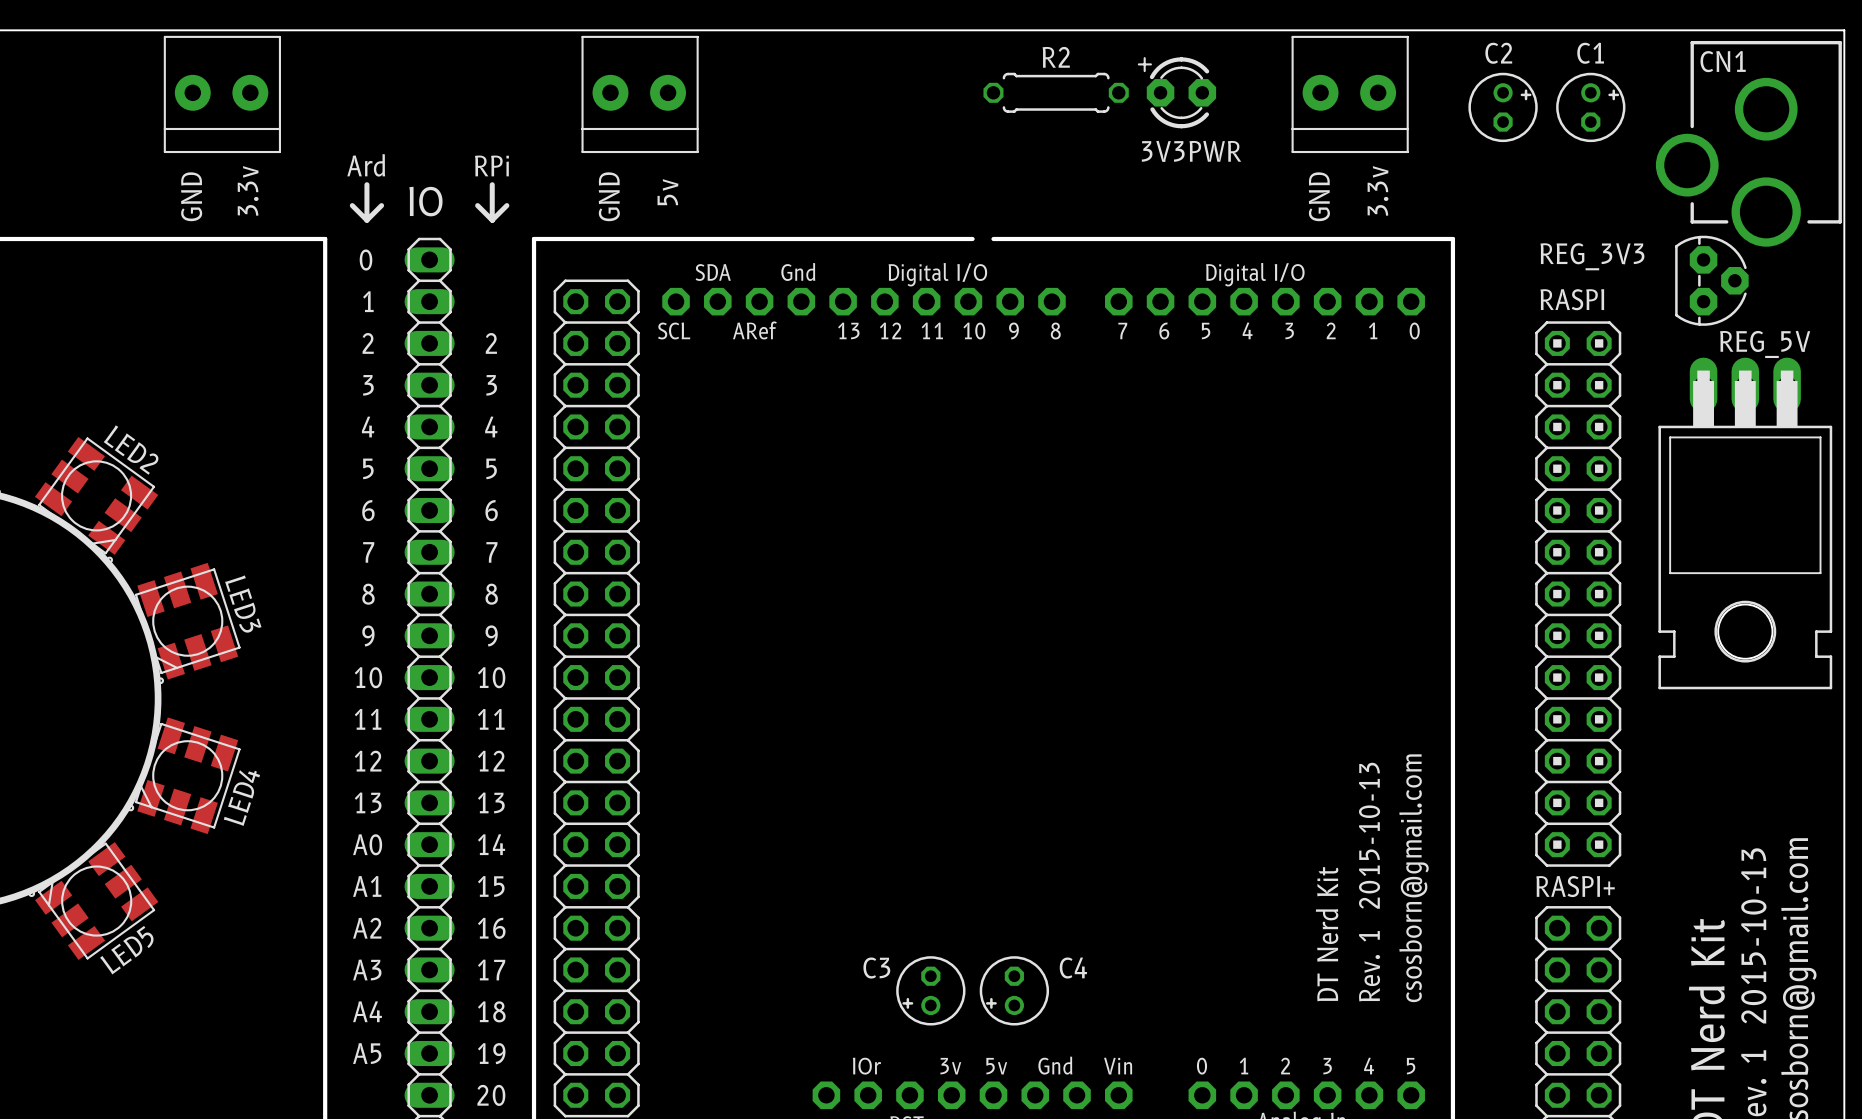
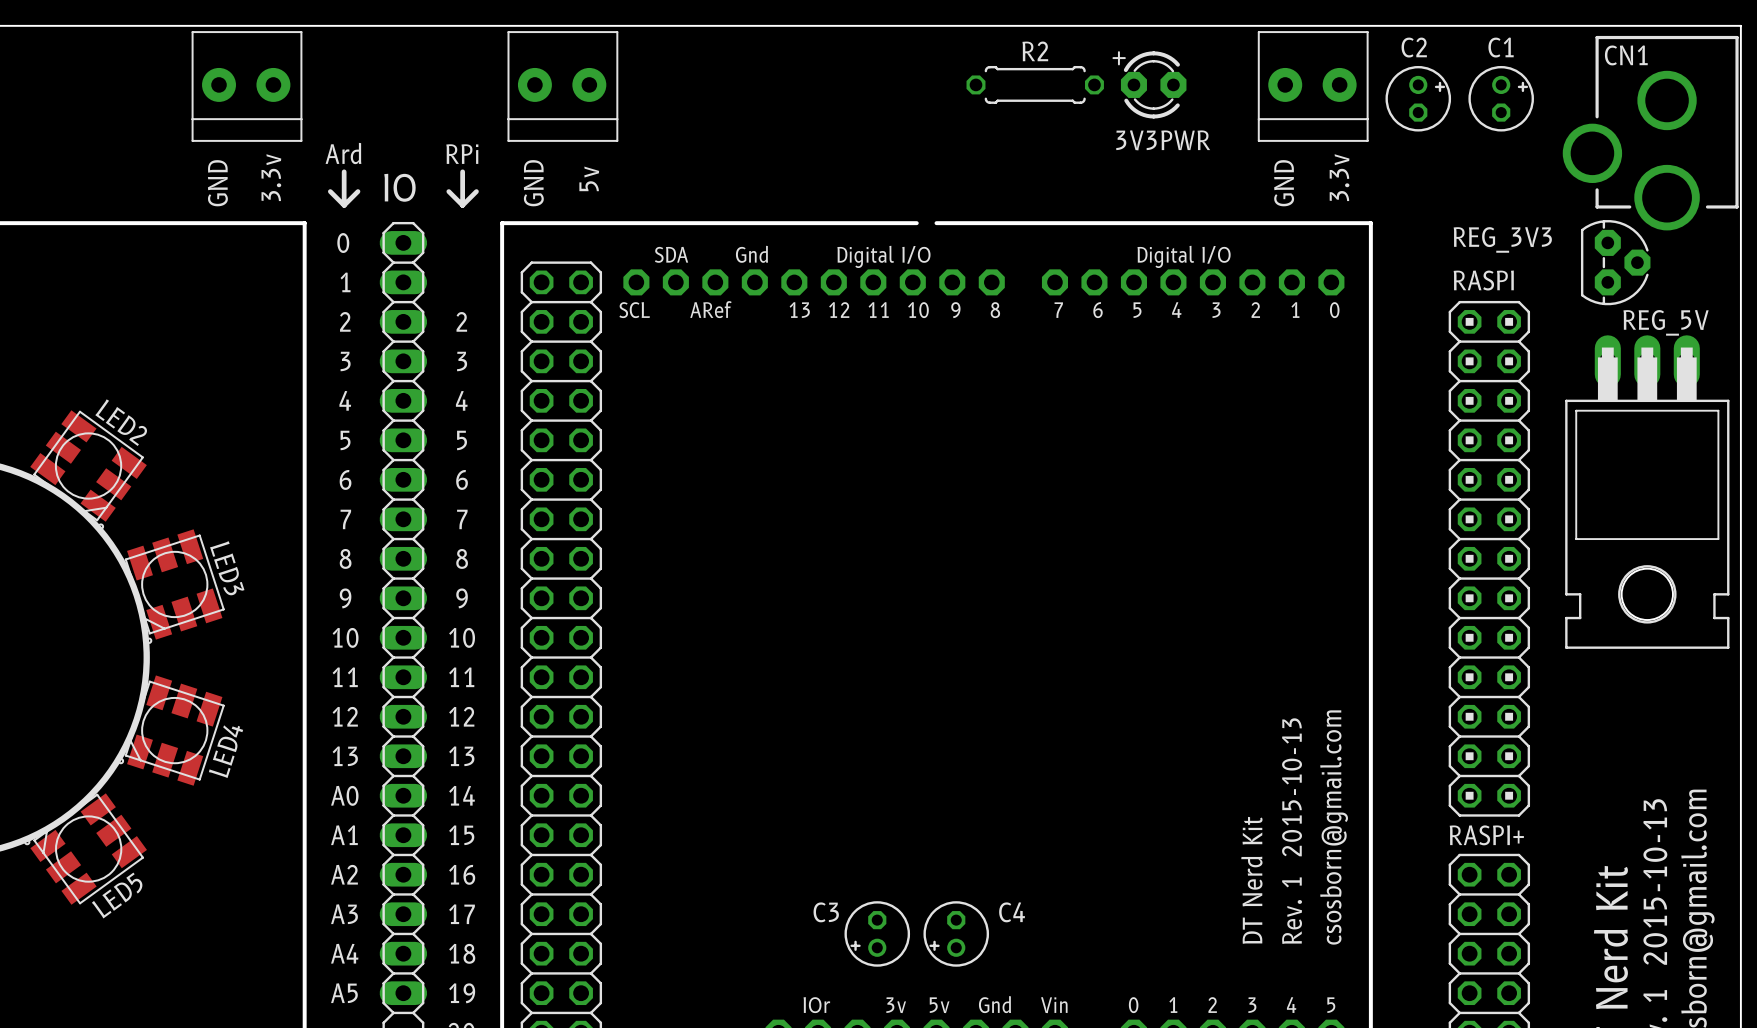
R2 position: (1056, 92) -> (1035, 84)
3V3PWR position: (1176, 92) -> (1149, 84)
part position: (222, 94) -> (246, 86)
part position: (640, 94) -> (562, 86)
part position: (1350, 94) -> (1313, 86)
text: 3.3v (248, 190) -> GND (217, 183)
text: none -> 3.3v (271, 177)
text position: 3.3v (1378, 190) -> 3.3v (1339, 177)
text position: 5v (667, 192) -> 5v (589, 178)
text: GND (191, 196) -> none
text position: GND (609, 196) -> GND (533, 183)
text position: GND (1319, 196) -> GND (1284, 183)

